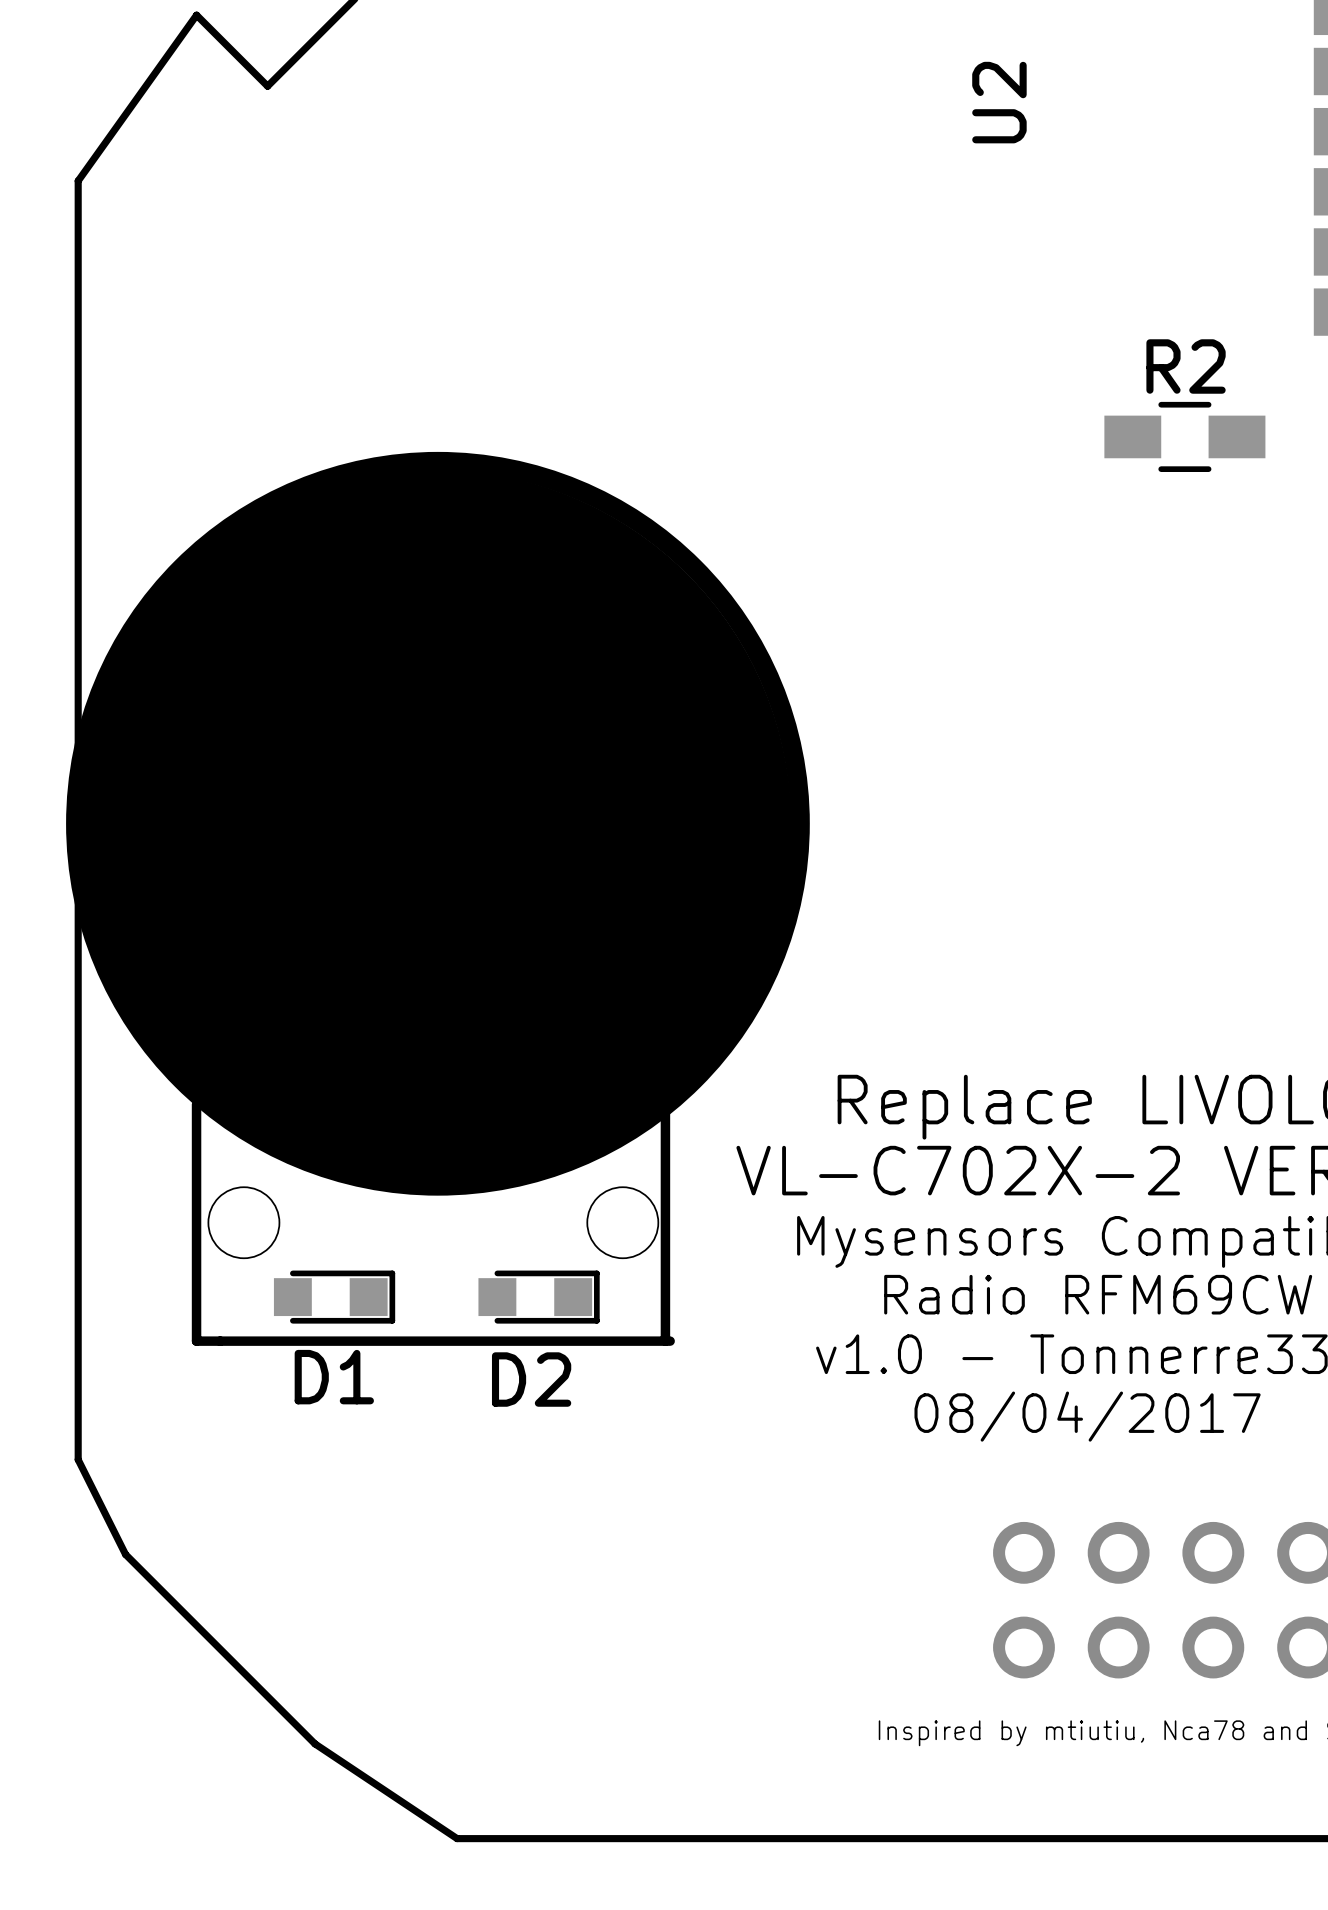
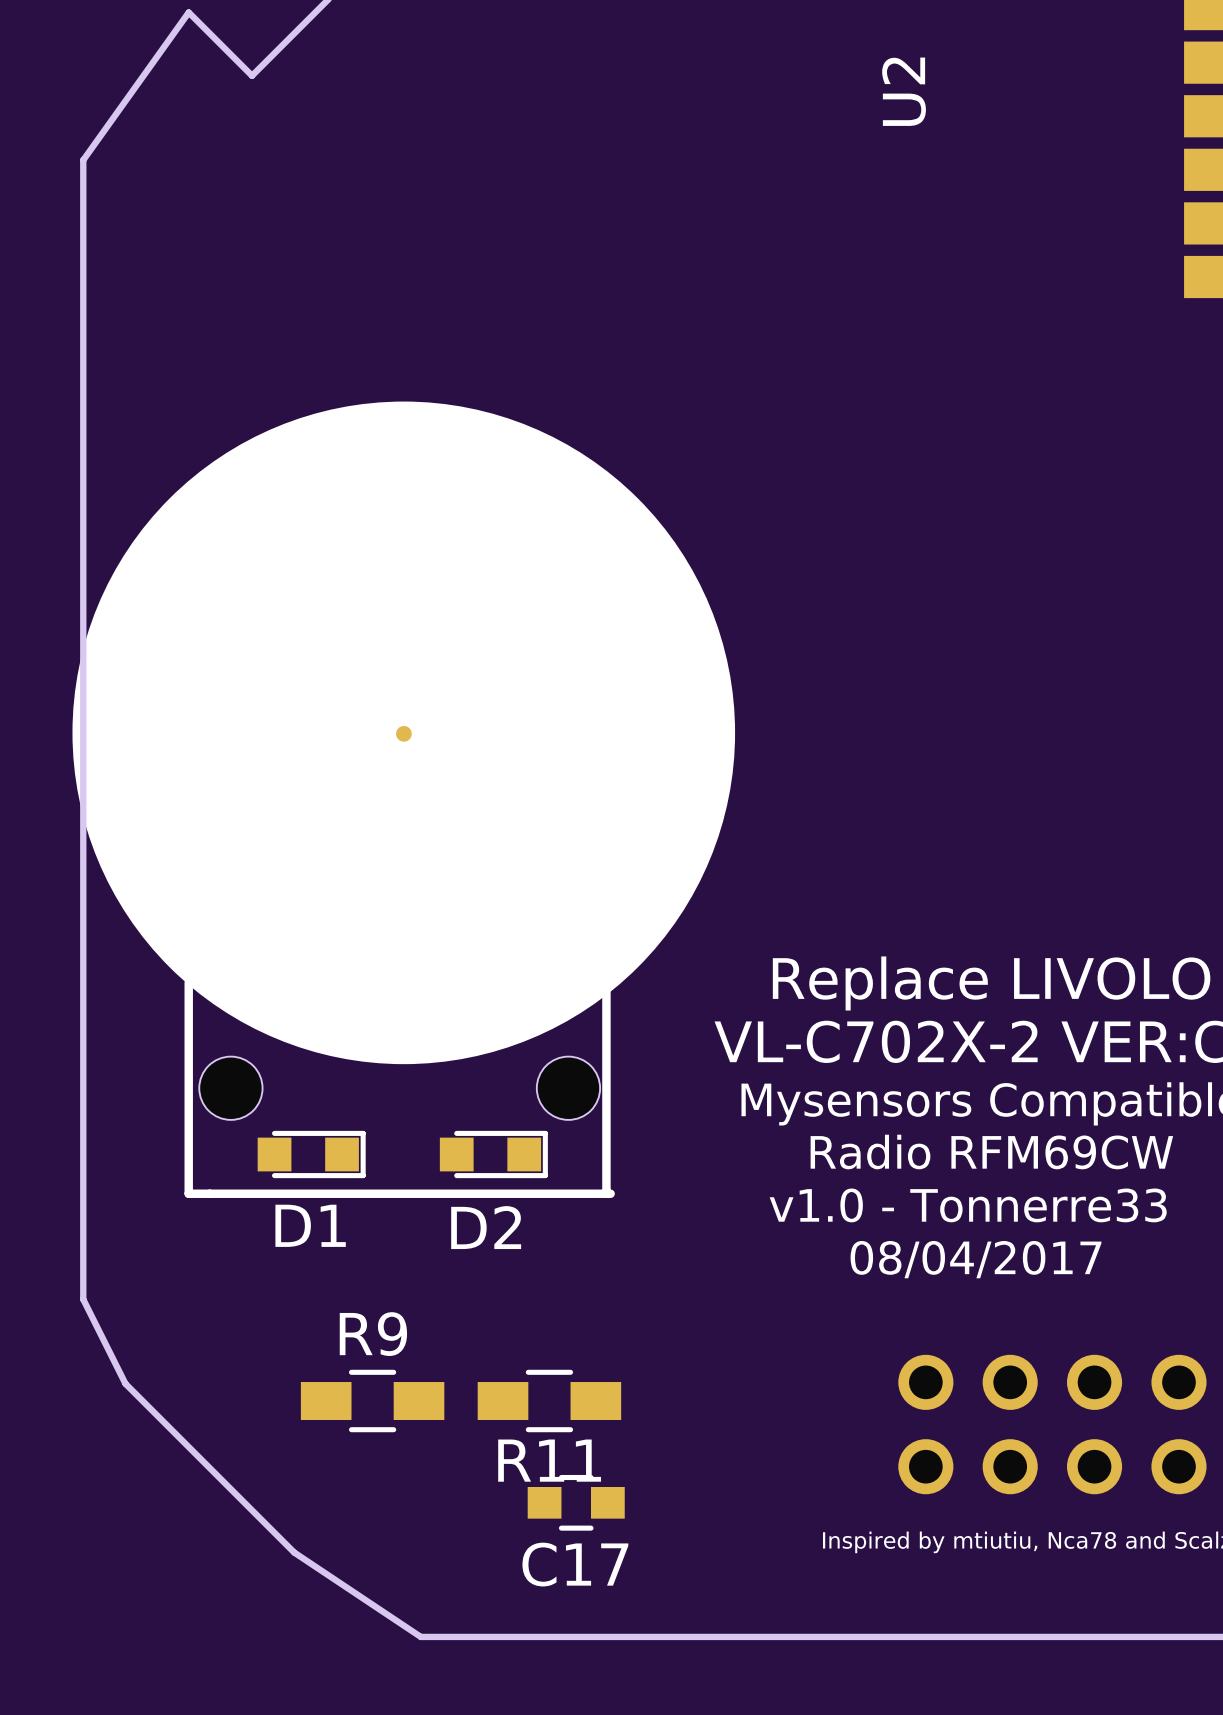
R2: (1184, 436) -> none
part footprint: [80, 469, 792, 1181] -> [76, 406, 732, 1062]
R9: none -> (372, 1401)
R11: none -> (549, 1401)
C17: none -> (576, 1502)

